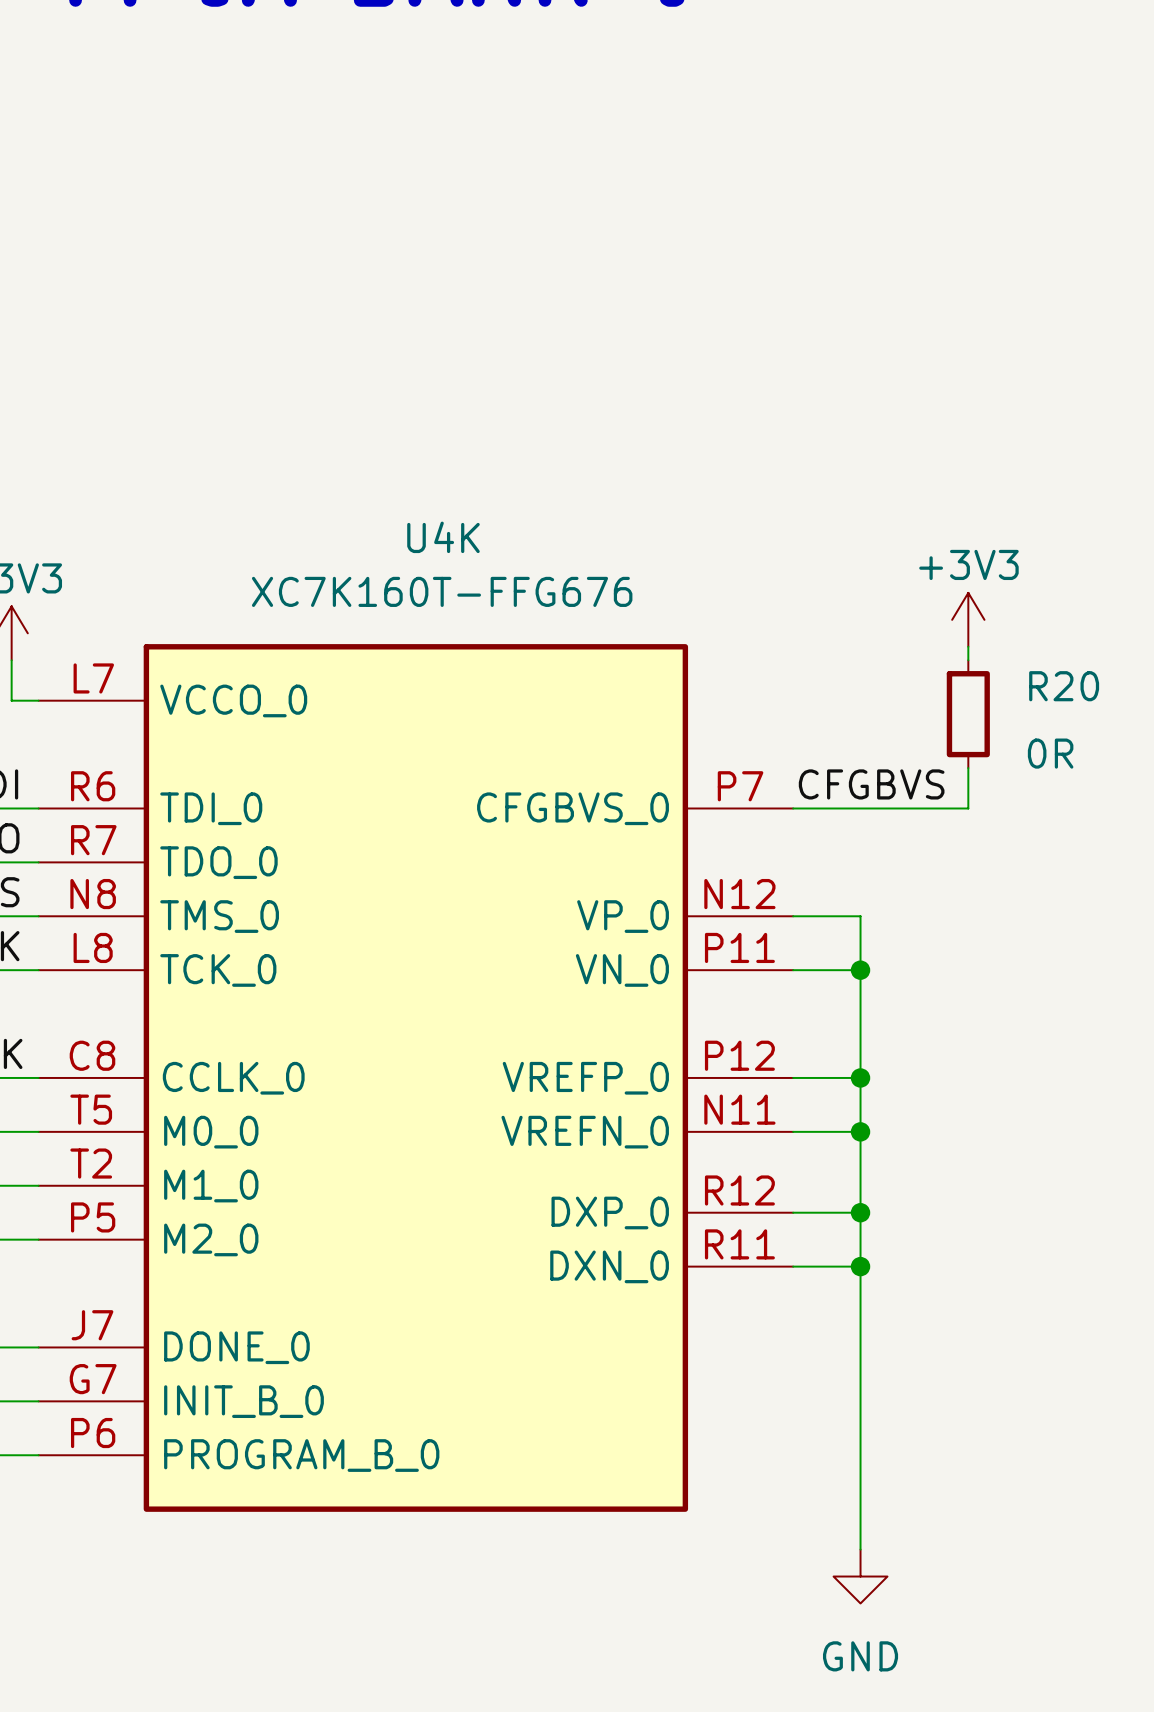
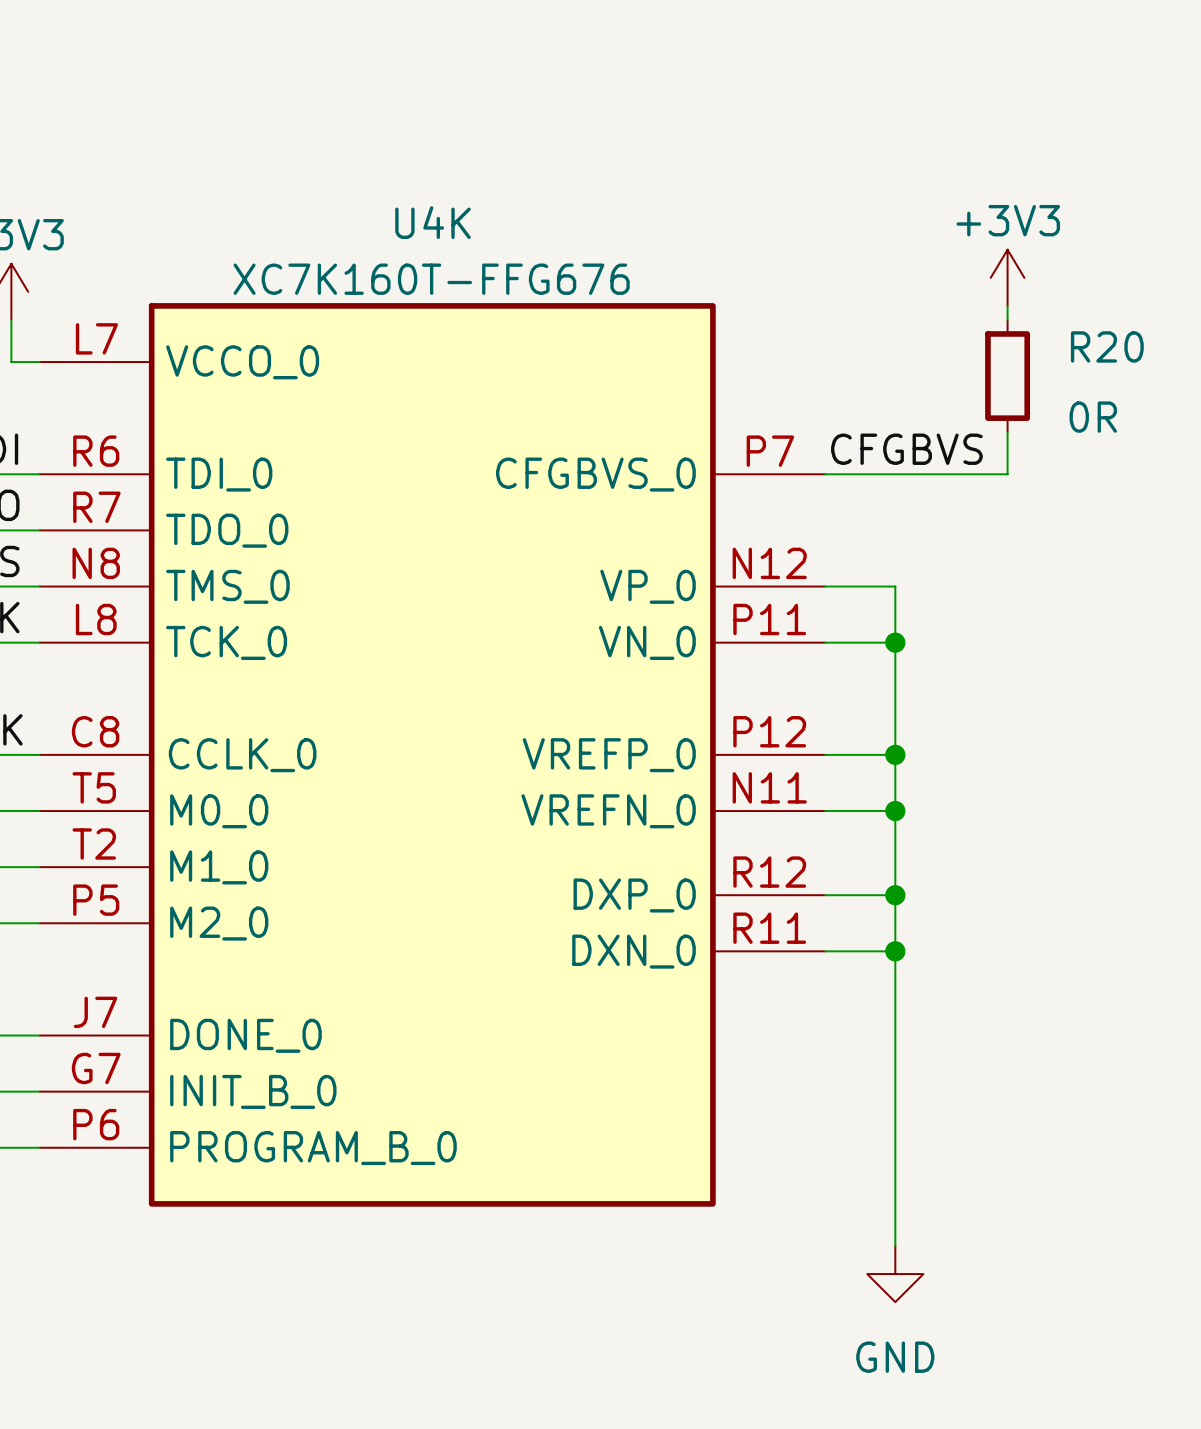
U4K name position: U4K (443, 537) -> U4K (432, 222)
U4K value position: XC7K160T-FFG676 (442, 591) -> XC7K160T-FFG676 (431, 279)

